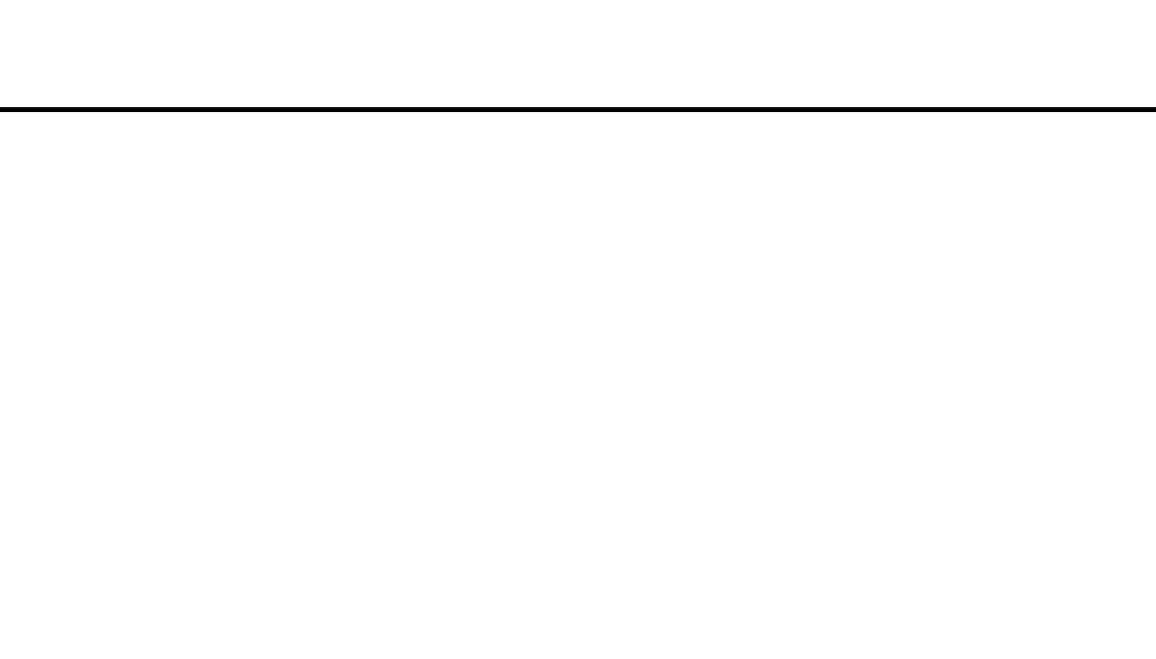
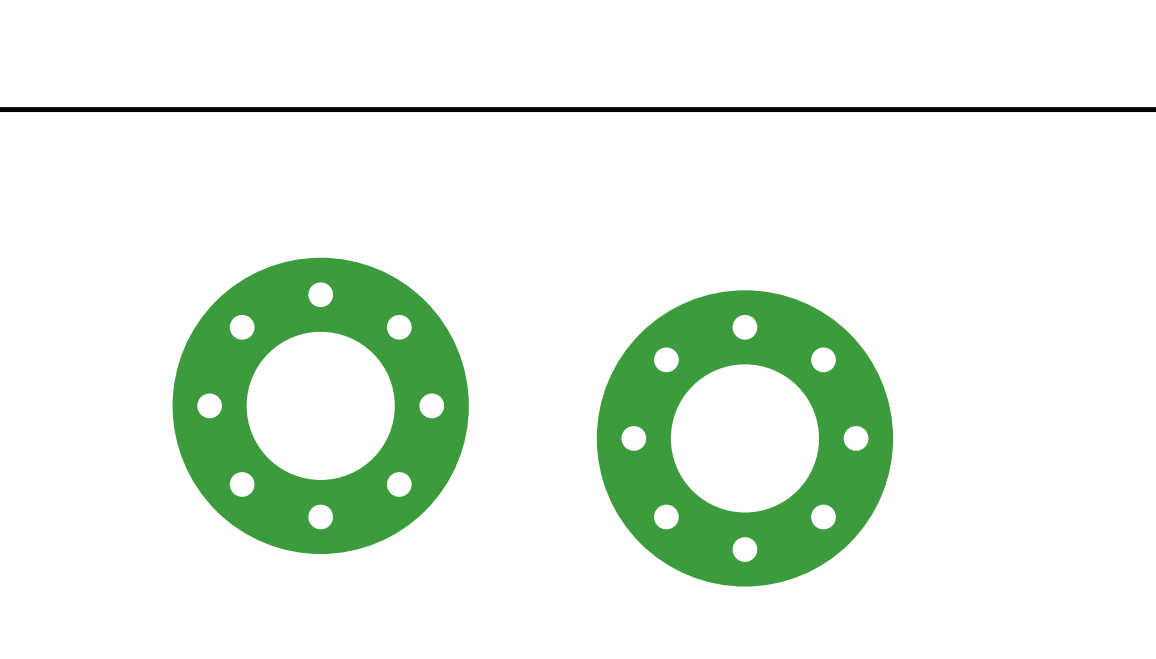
part: none -> (320, 405)
part: none -> (744, 438)

